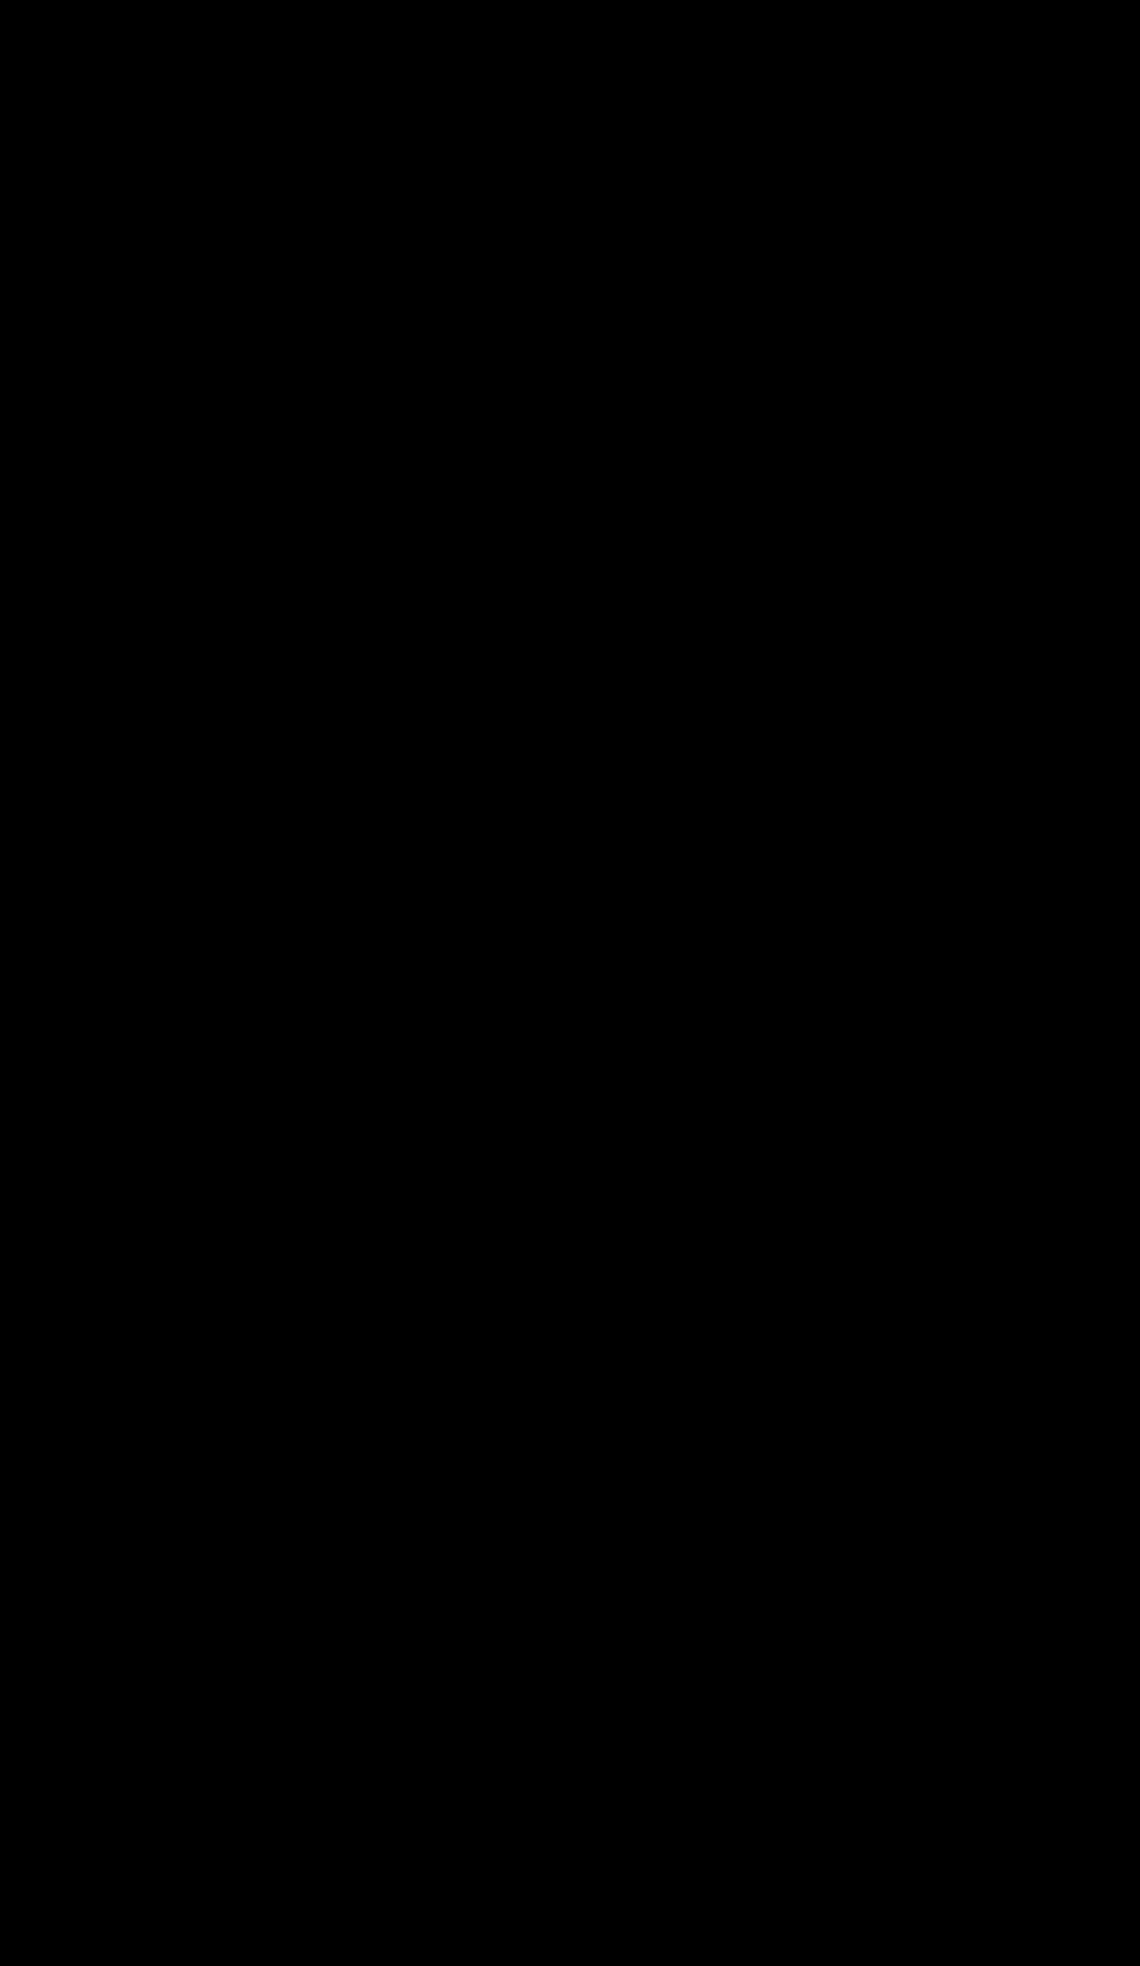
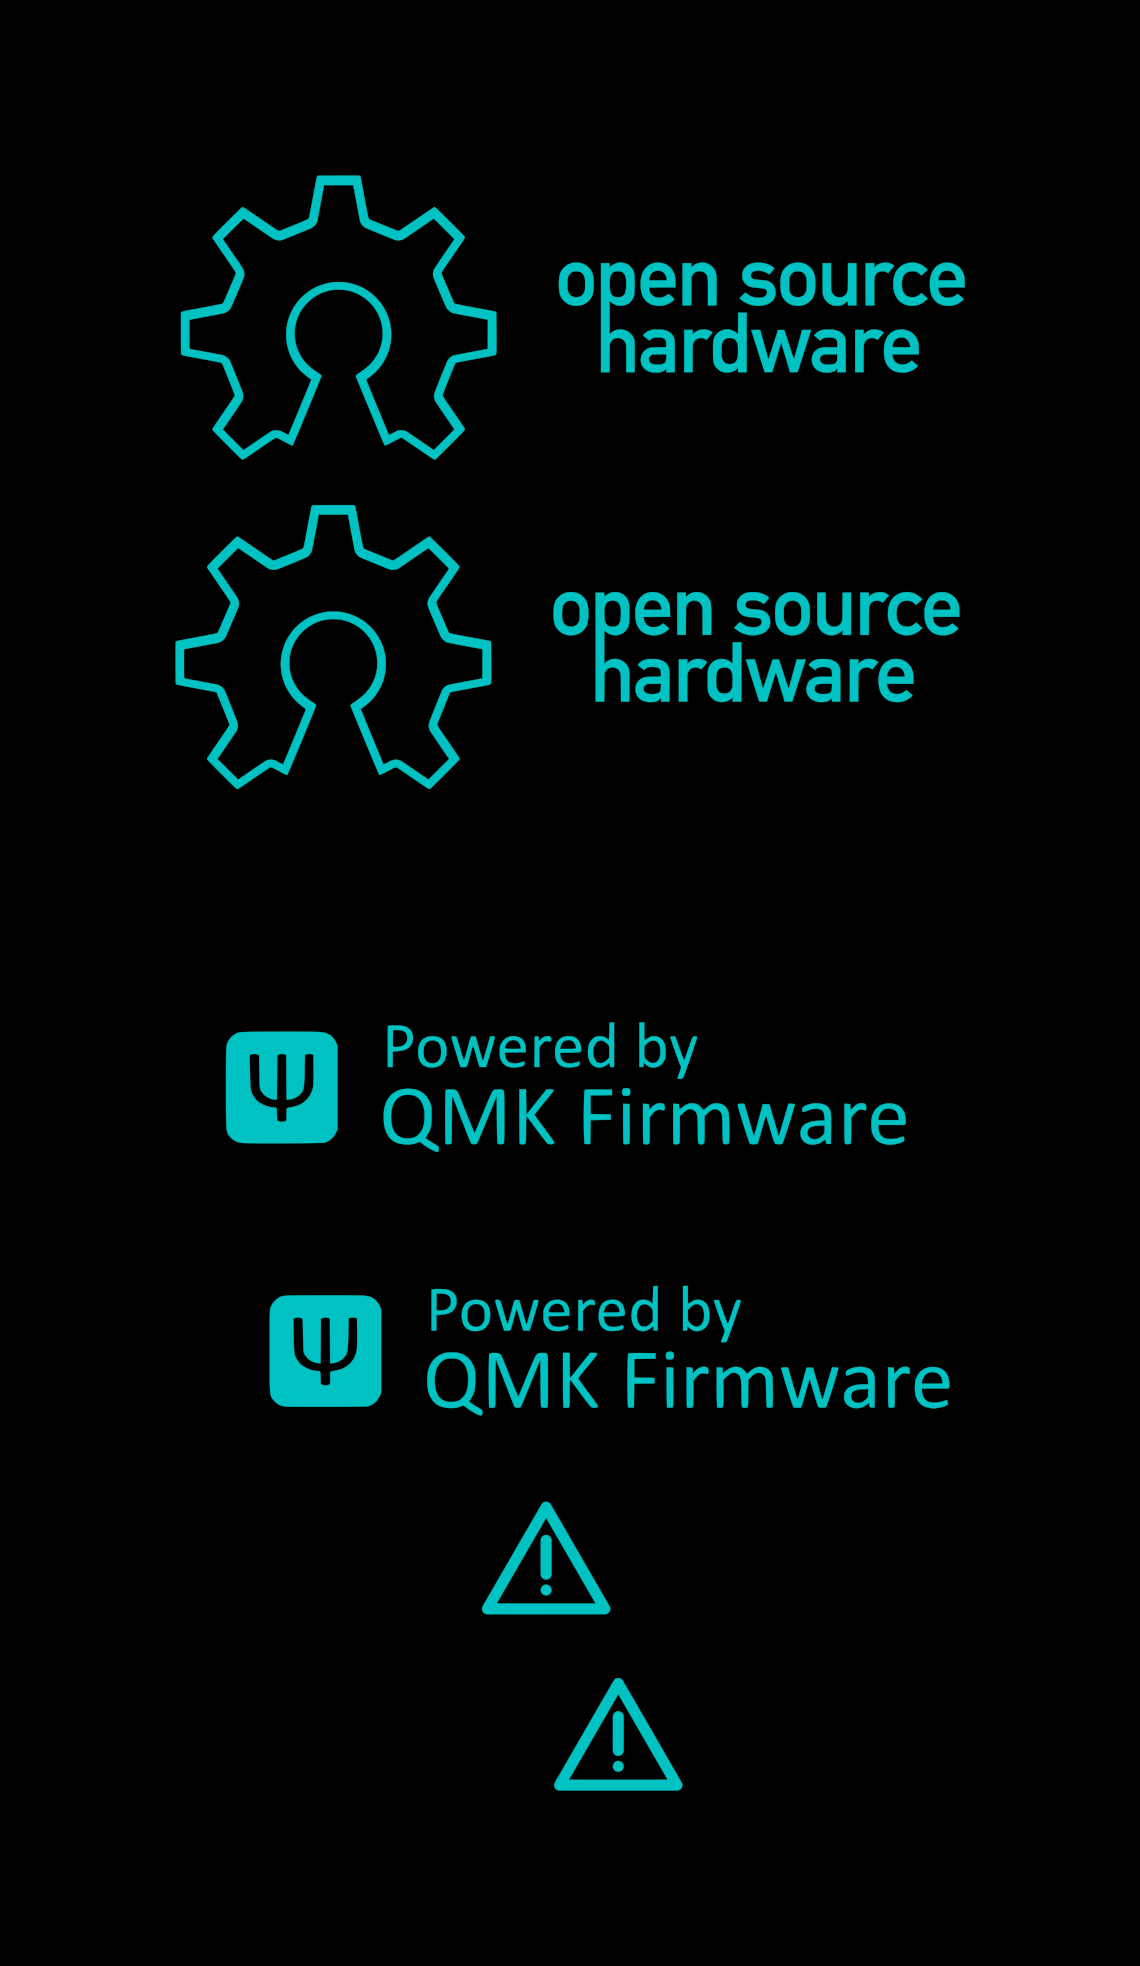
drawing: none -> [180, 175, 965, 460]
drawing: none -> [175, 504, 960, 790]
drawing: none -> [225, 1022, 906, 1153]
drawing: none -> [269, 1285, 950, 1416]
drawing: none -> [481, 1501, 611, 1615]
drawing: none -> [554, 1677, 683, 1791]

